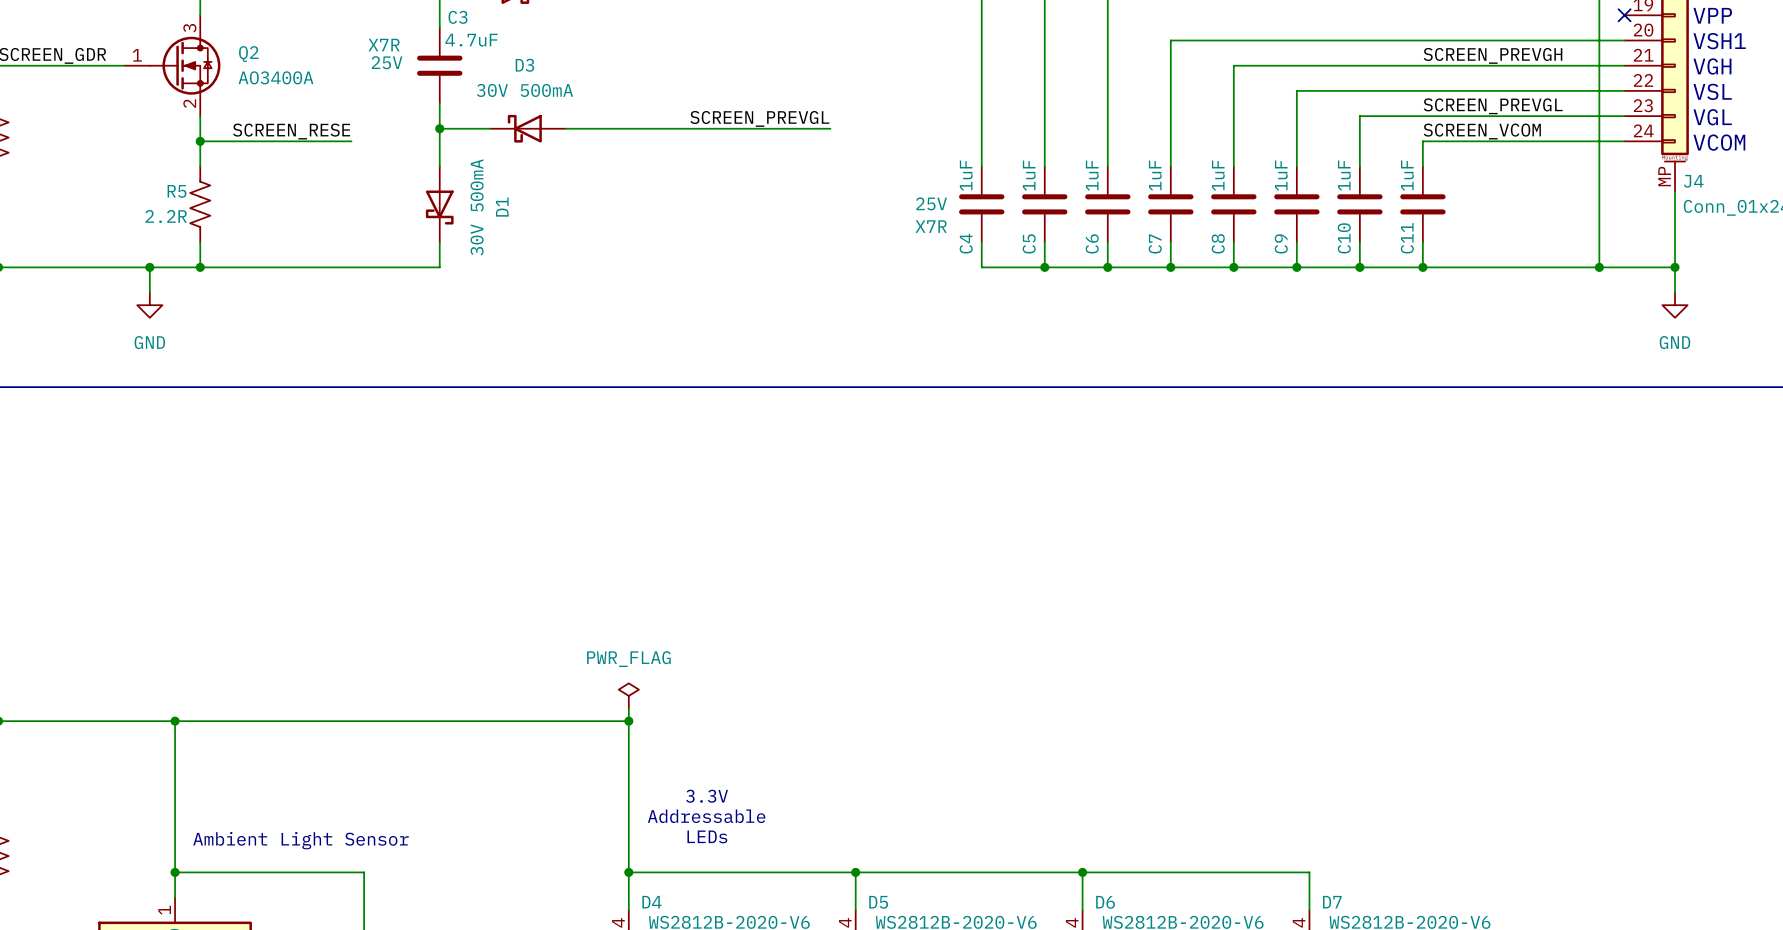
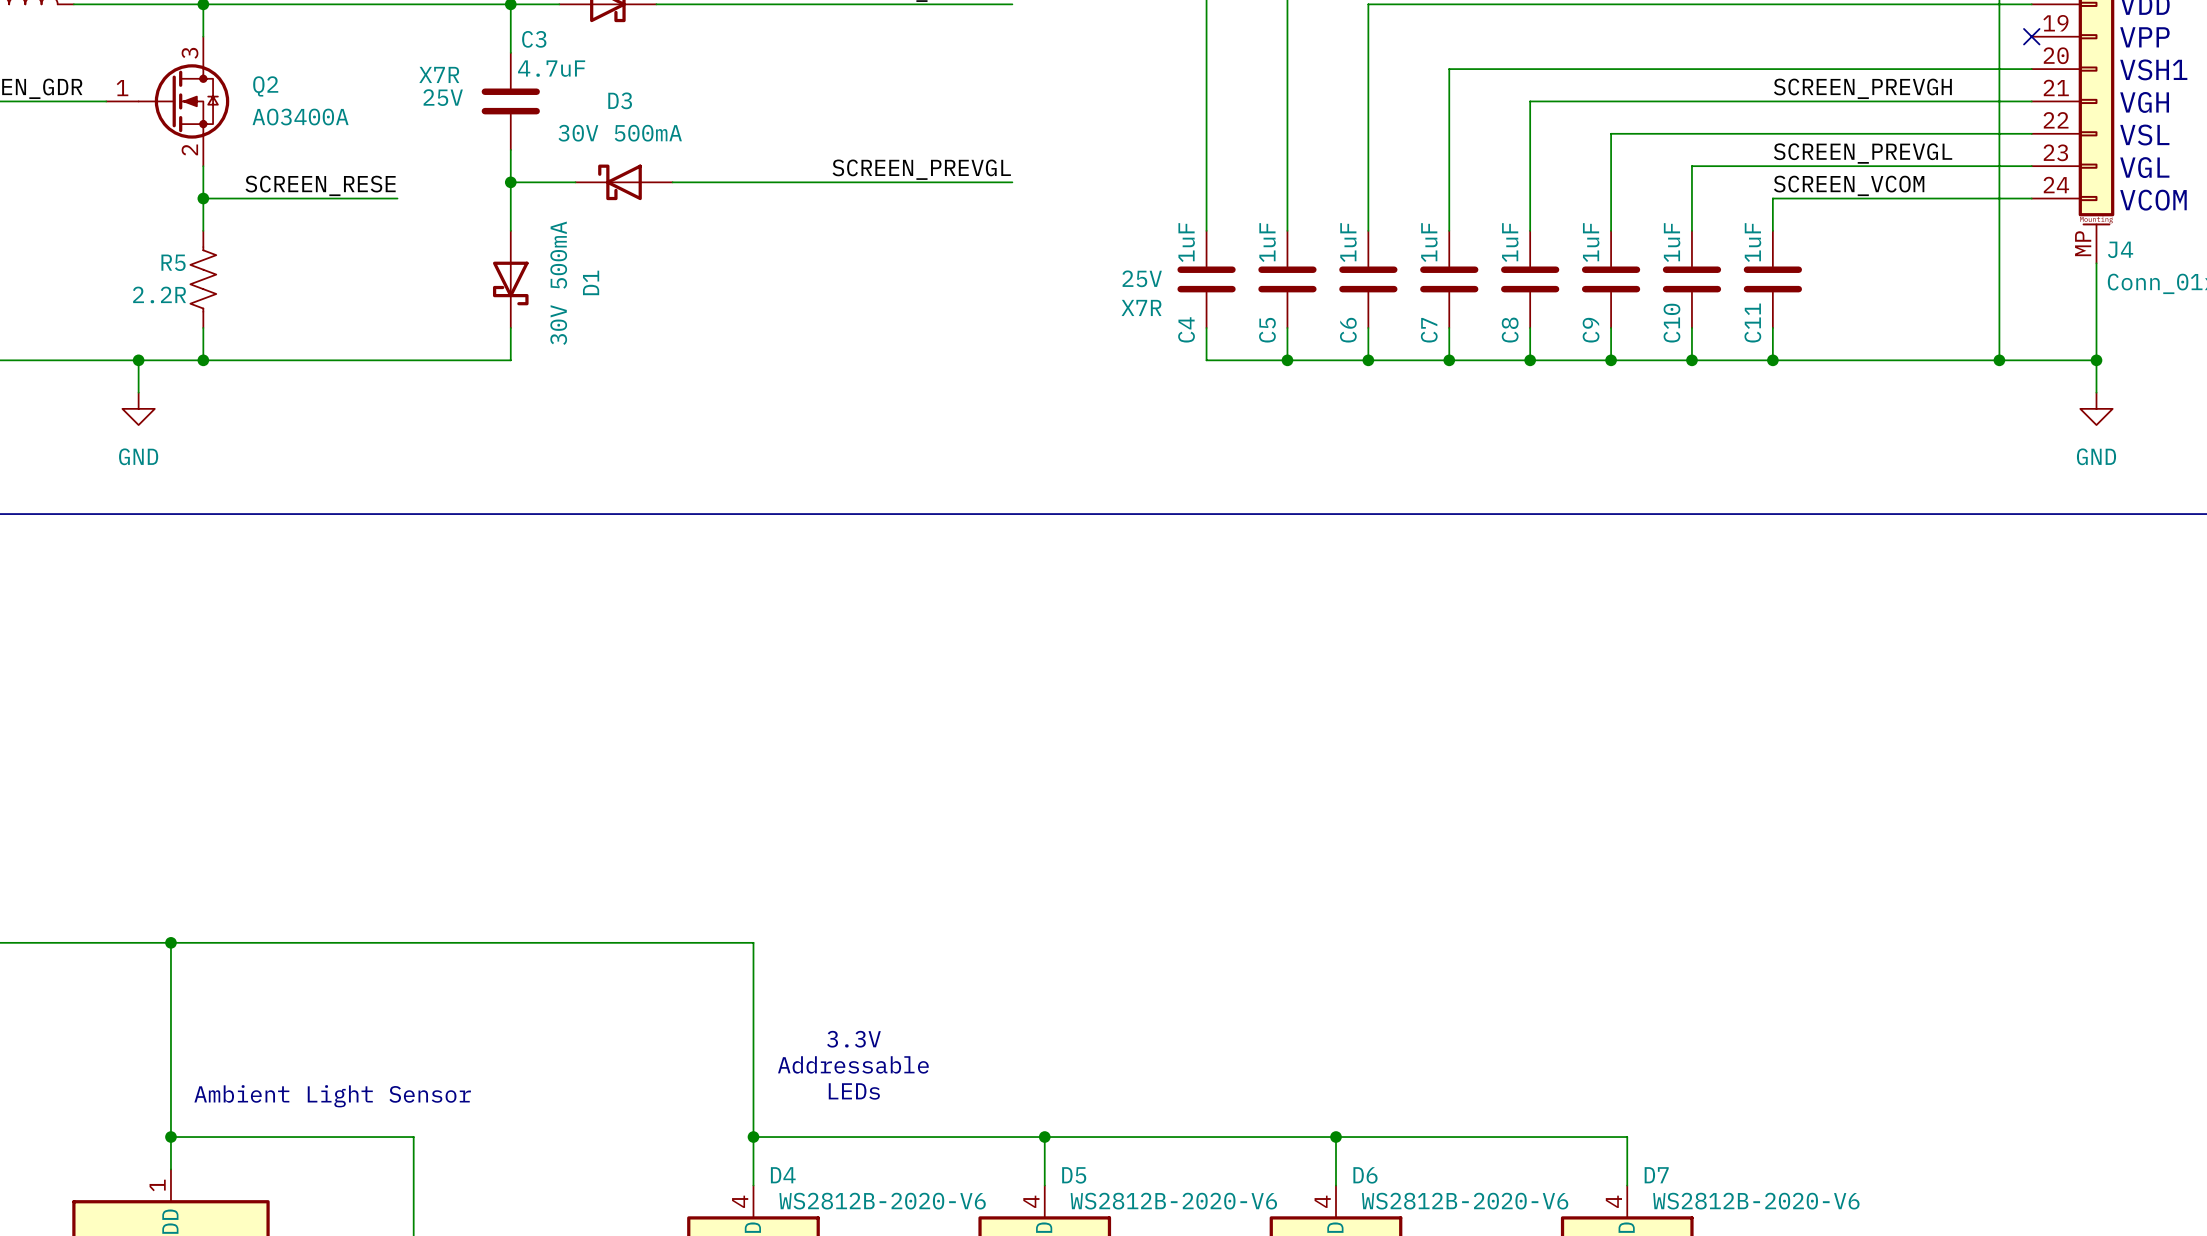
power symbol: PWR_FLAG (628, 695) -> none
wire: (628, 708) (628, 721) -> none
junction: (628, 721) -> none

